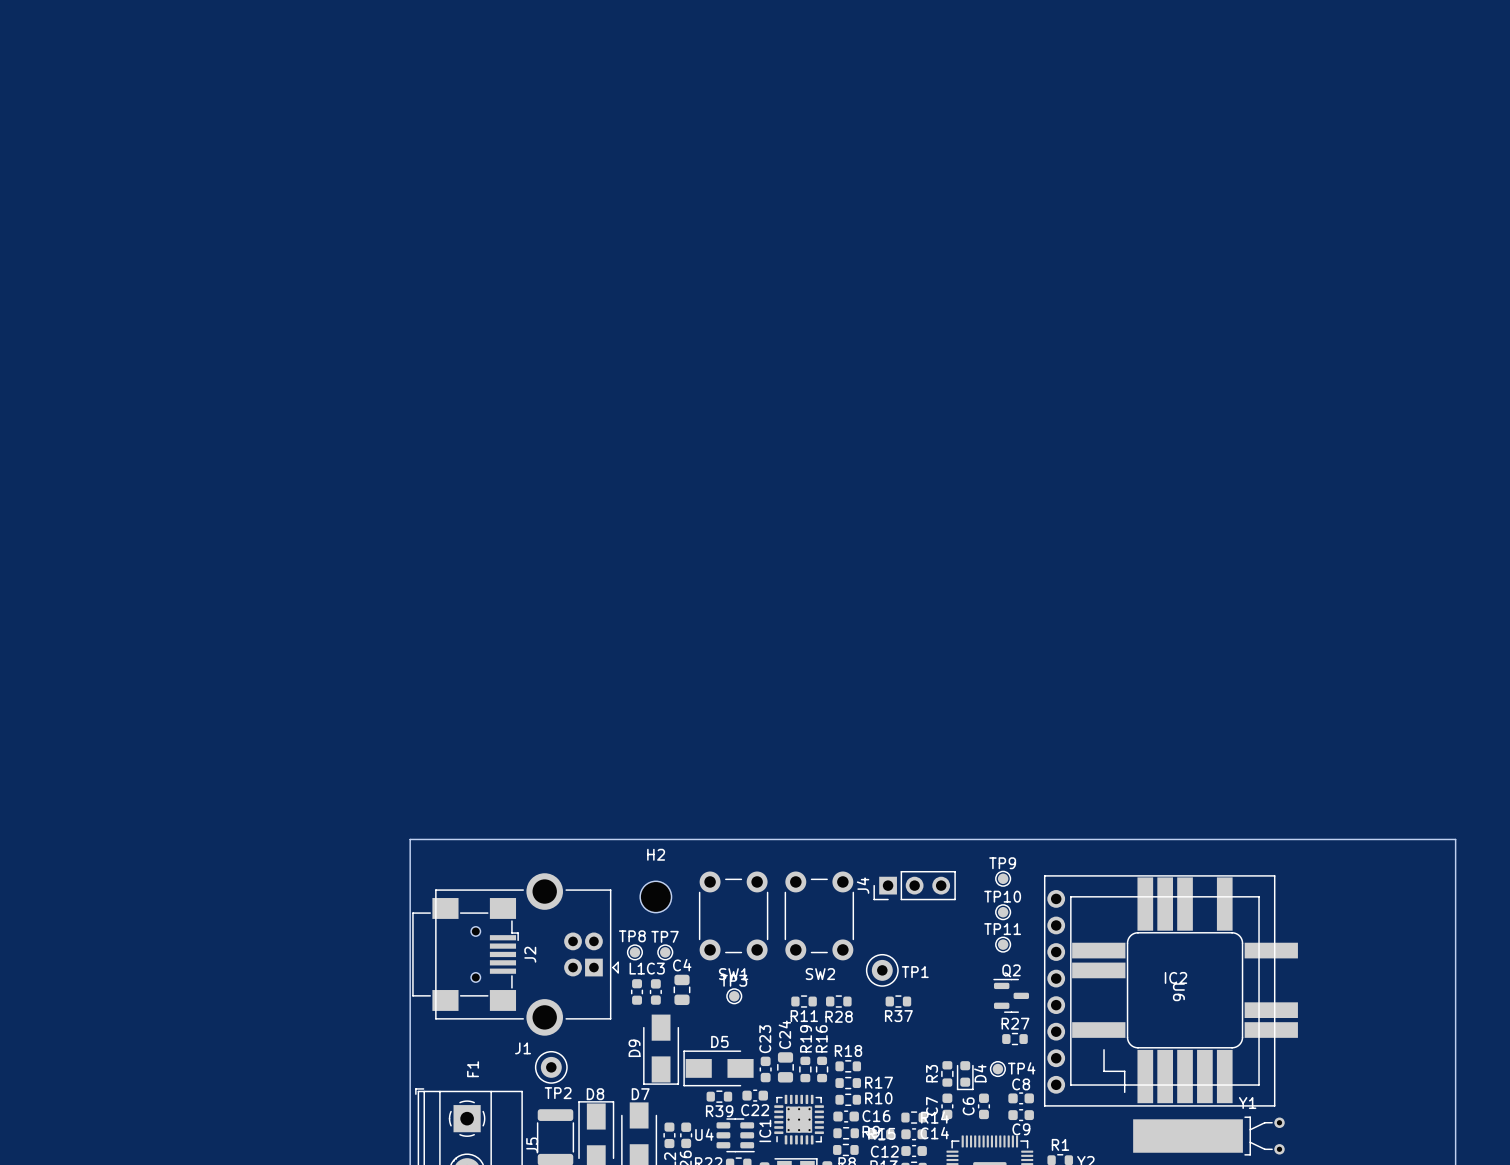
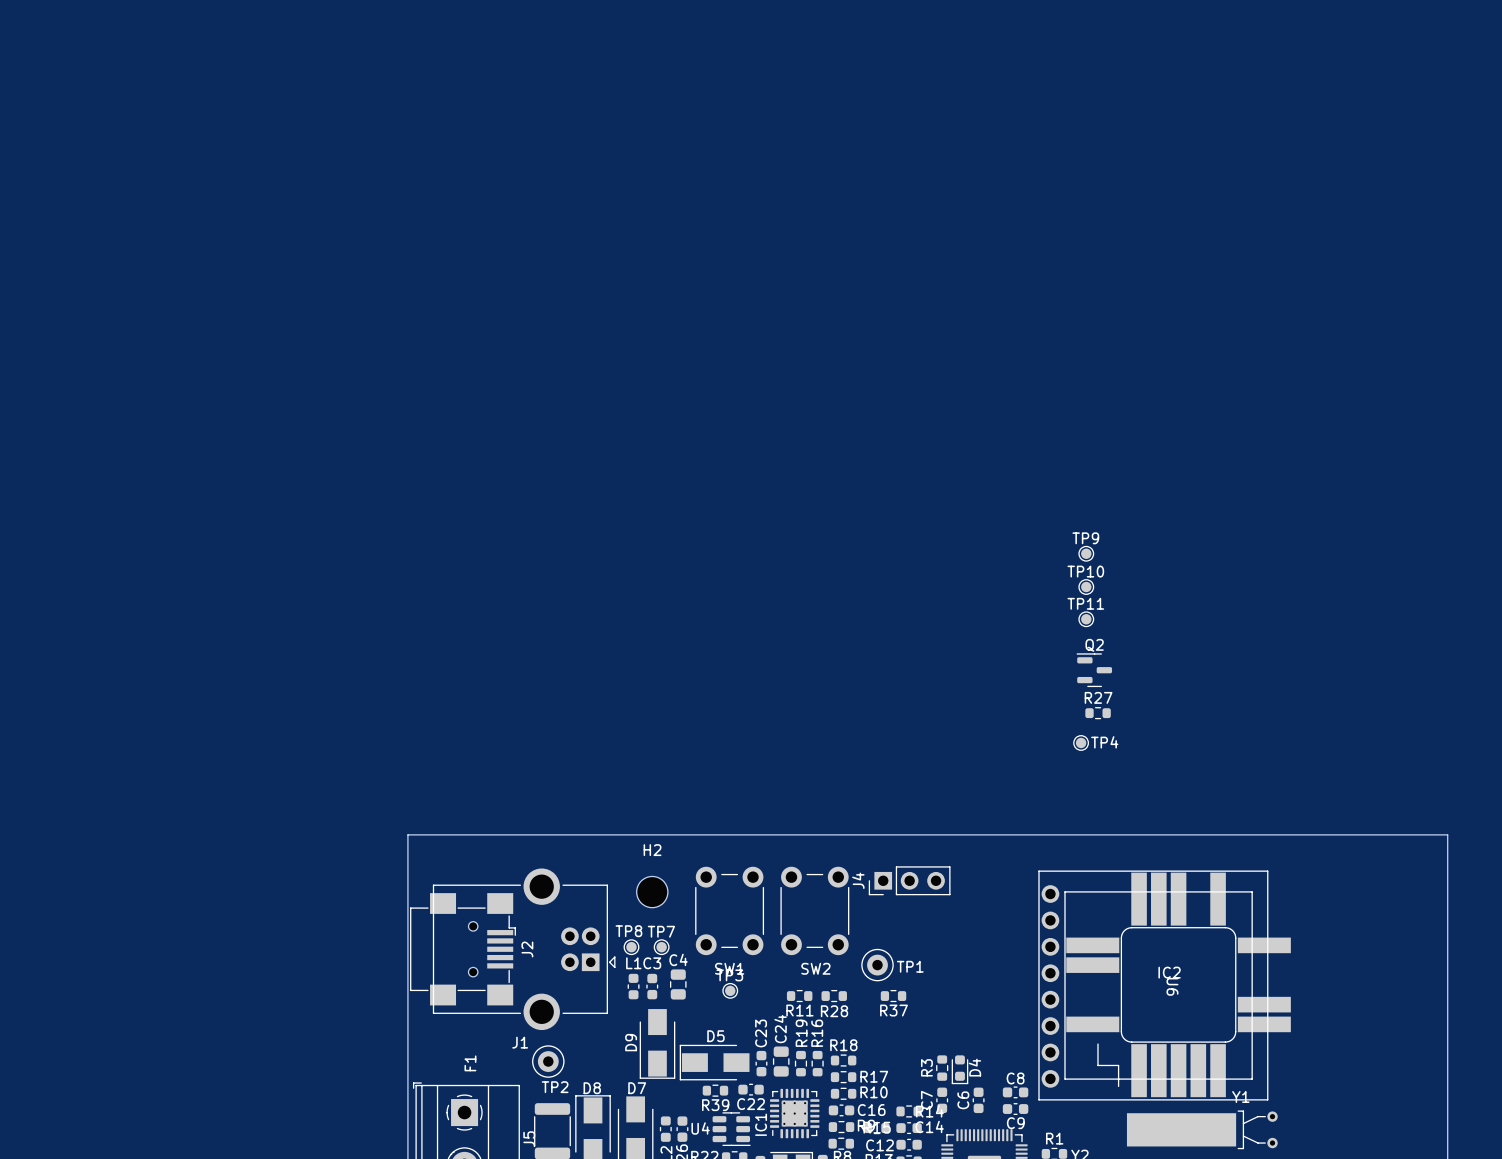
TP9 position: (1003, 878) -> (1086, 553)
TP10 position: (1003, 912) -> (1086, 587)
TP11 position: (1003, 944) -> (1086, 619)
Q2 position: (1011, 995) -> (1094, 670)
R27 position: (1014, 1039) -> (1098, 713)
TP4 position: (997, 1069) -> (1081, 742)

